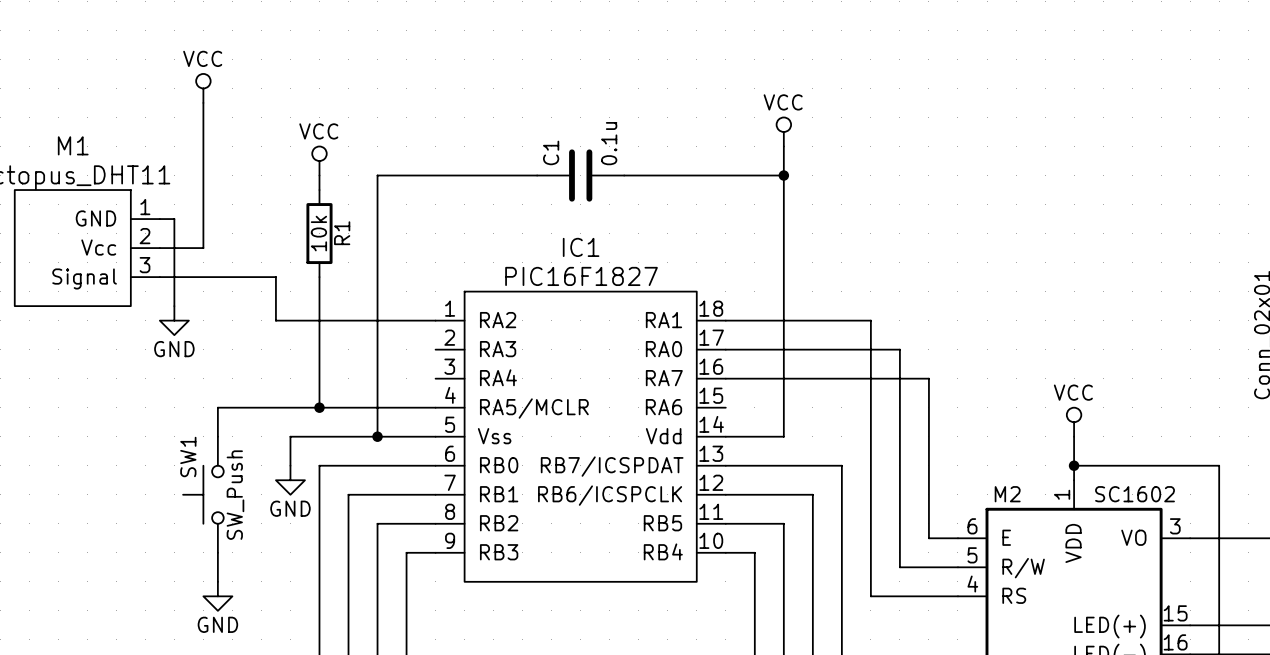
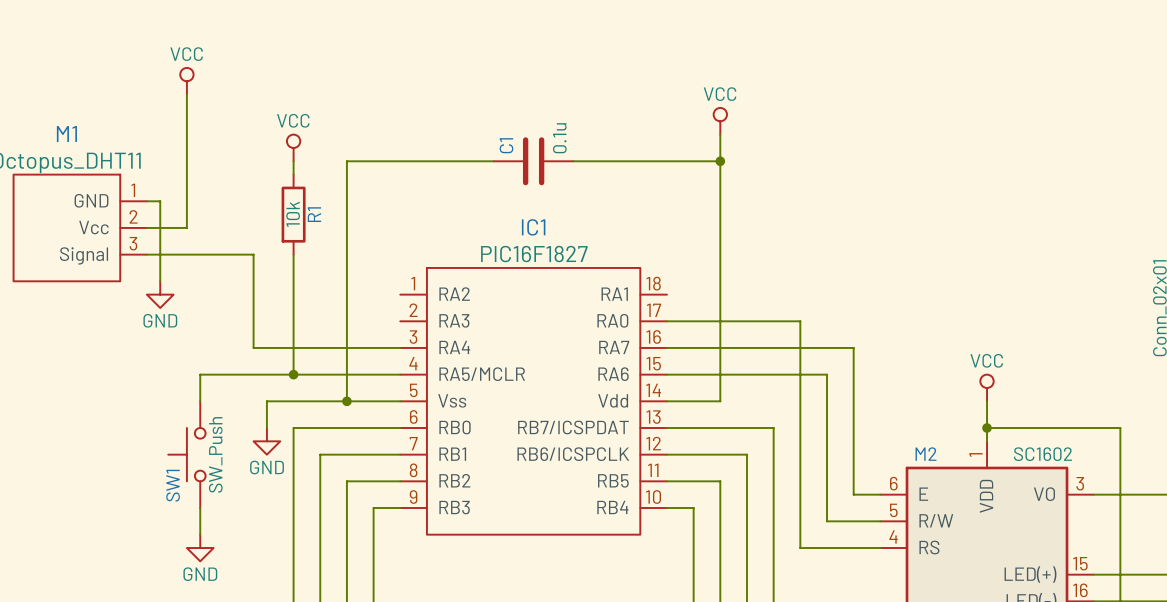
wire: (275, 320) (435, 320) -> (253, 294) (253, 347) (400, 347)
wire: (725, 320) (870, 320) (870, 349) (899, 349) (899, 407) -> (666, 374) (826, 374)
SW1 name position: SW1 (188, 456) -> SW1 (173, 485)

